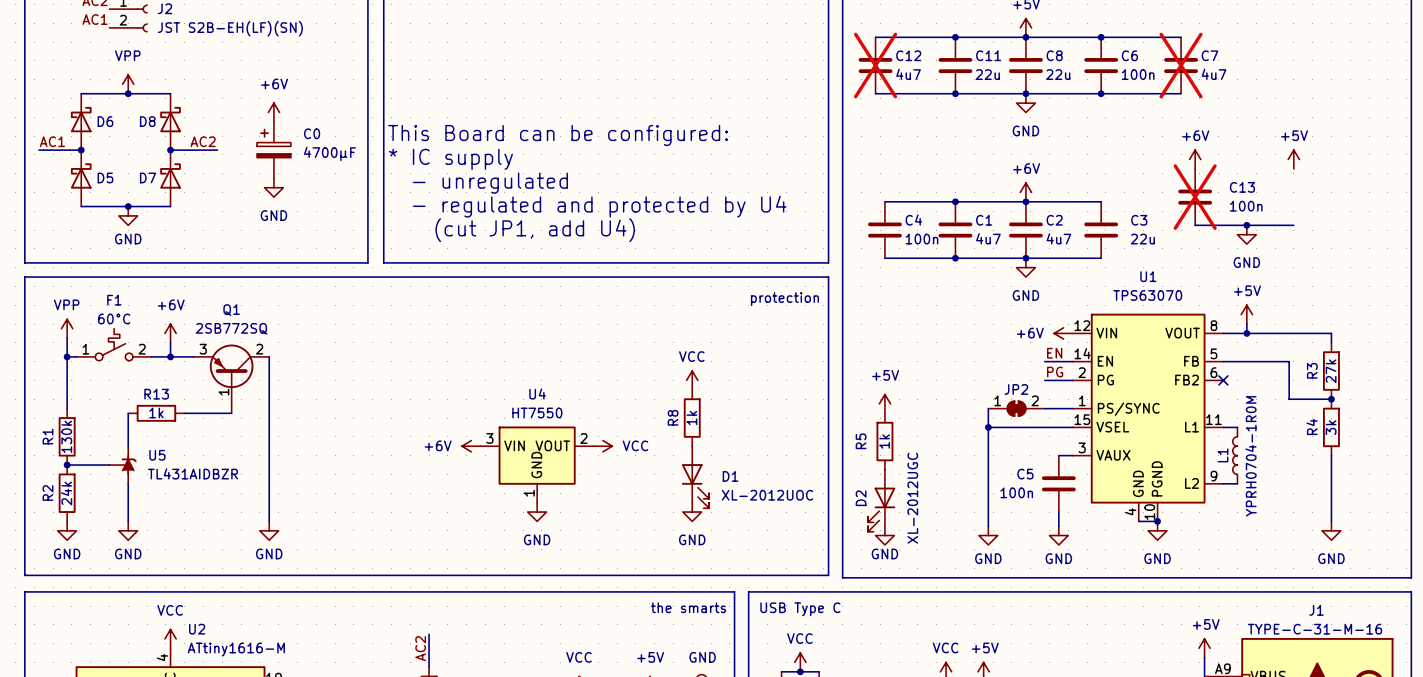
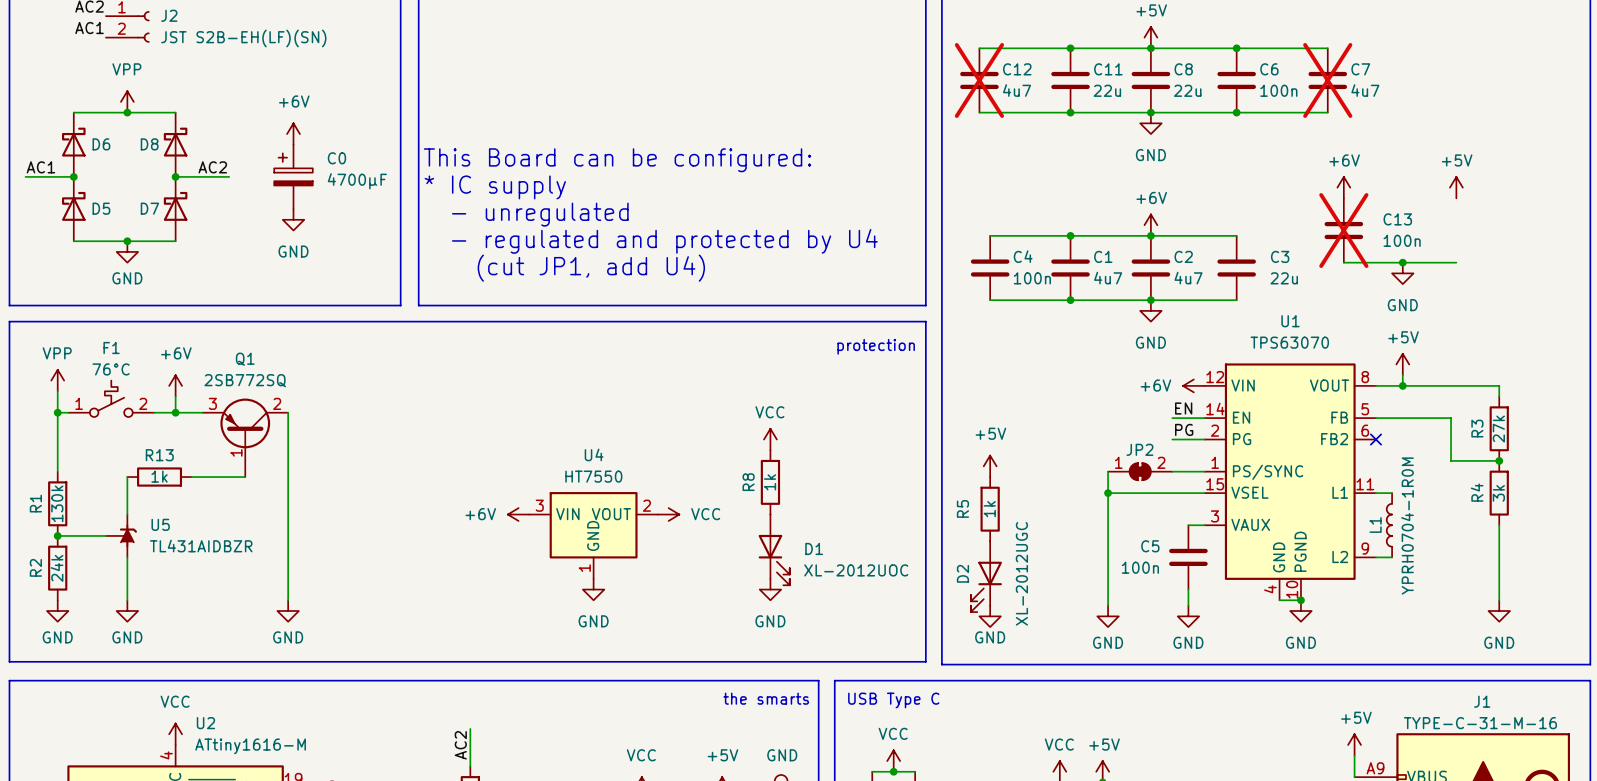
F1 value: 60°C (114, 318) -> 76°C (111, 369)

